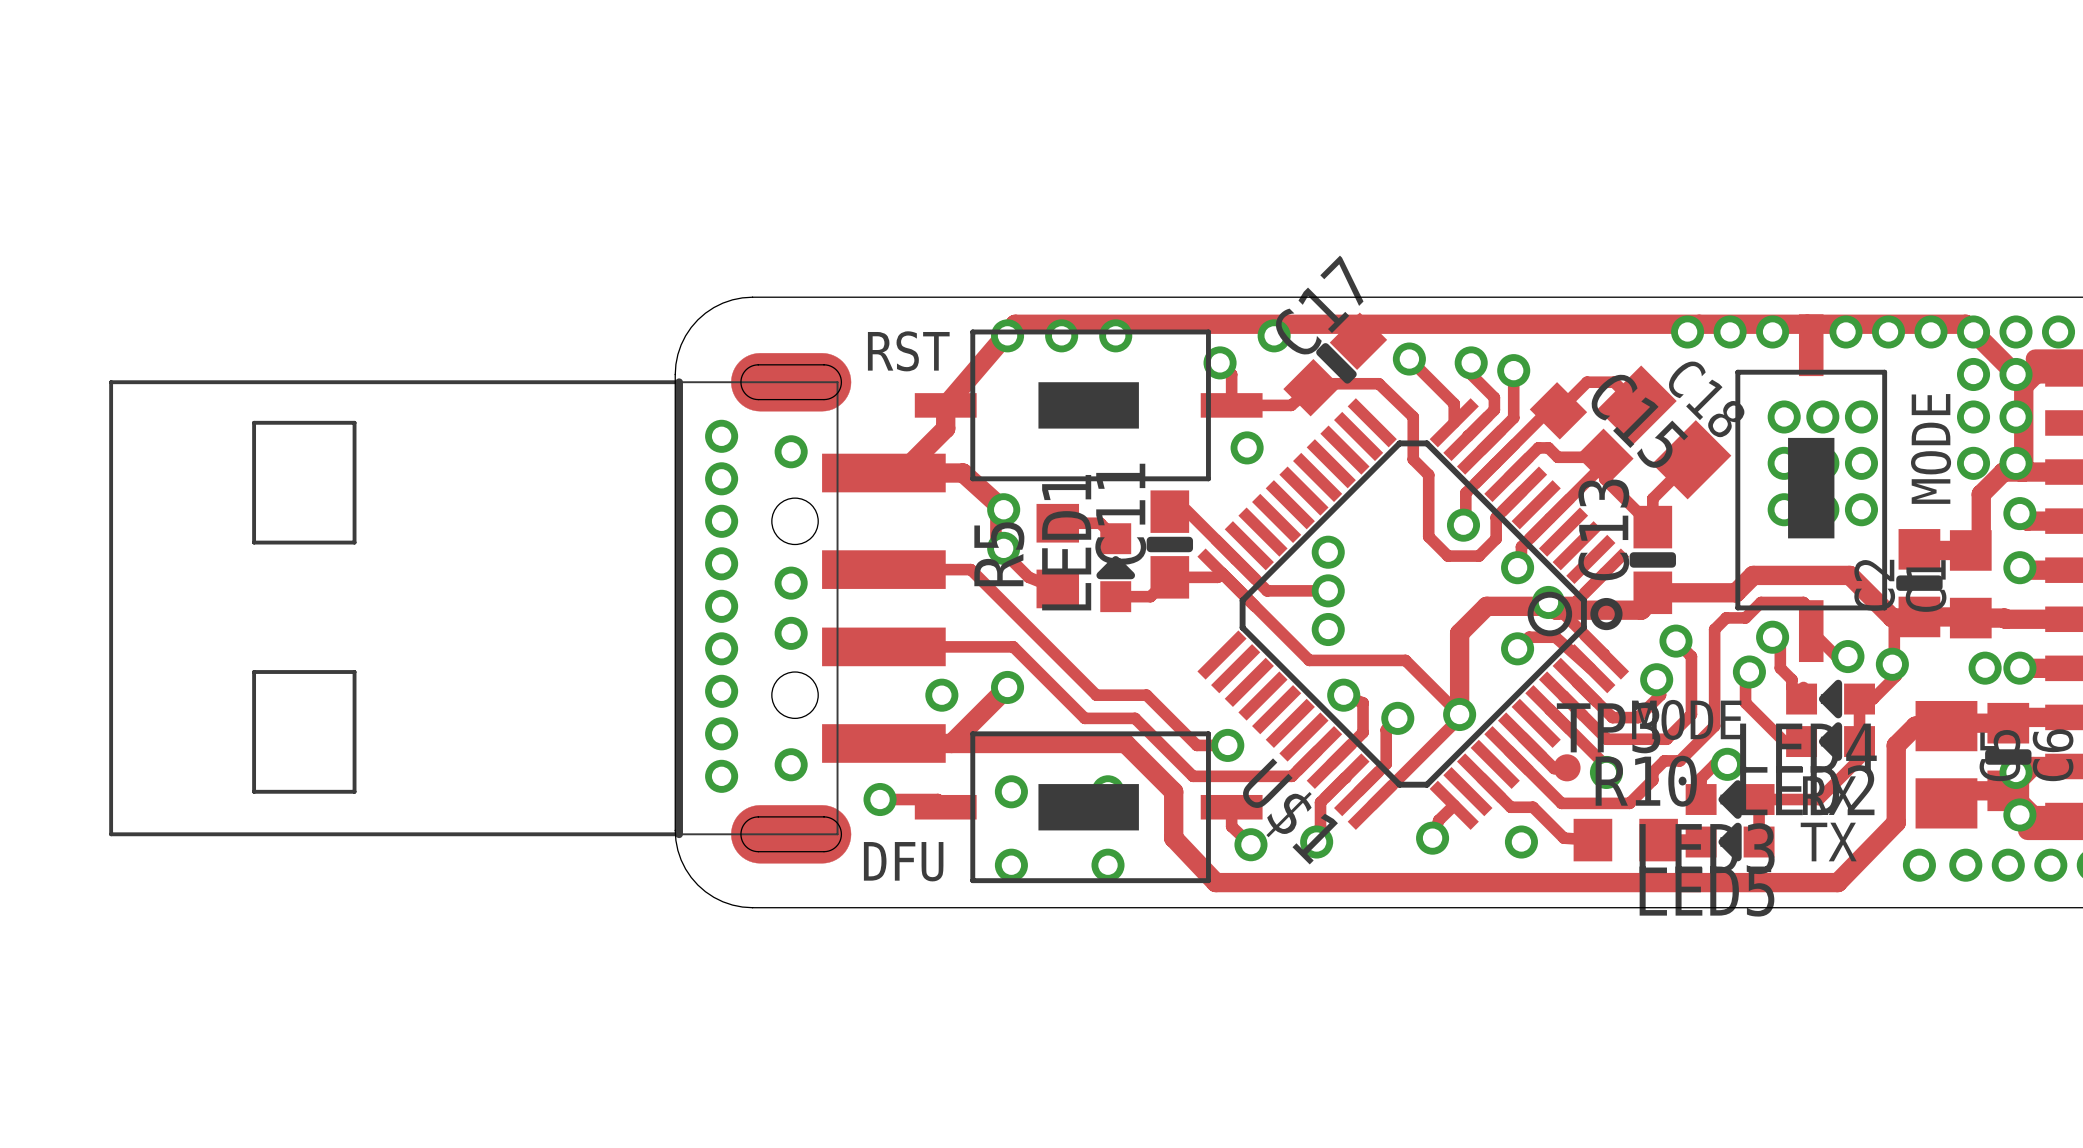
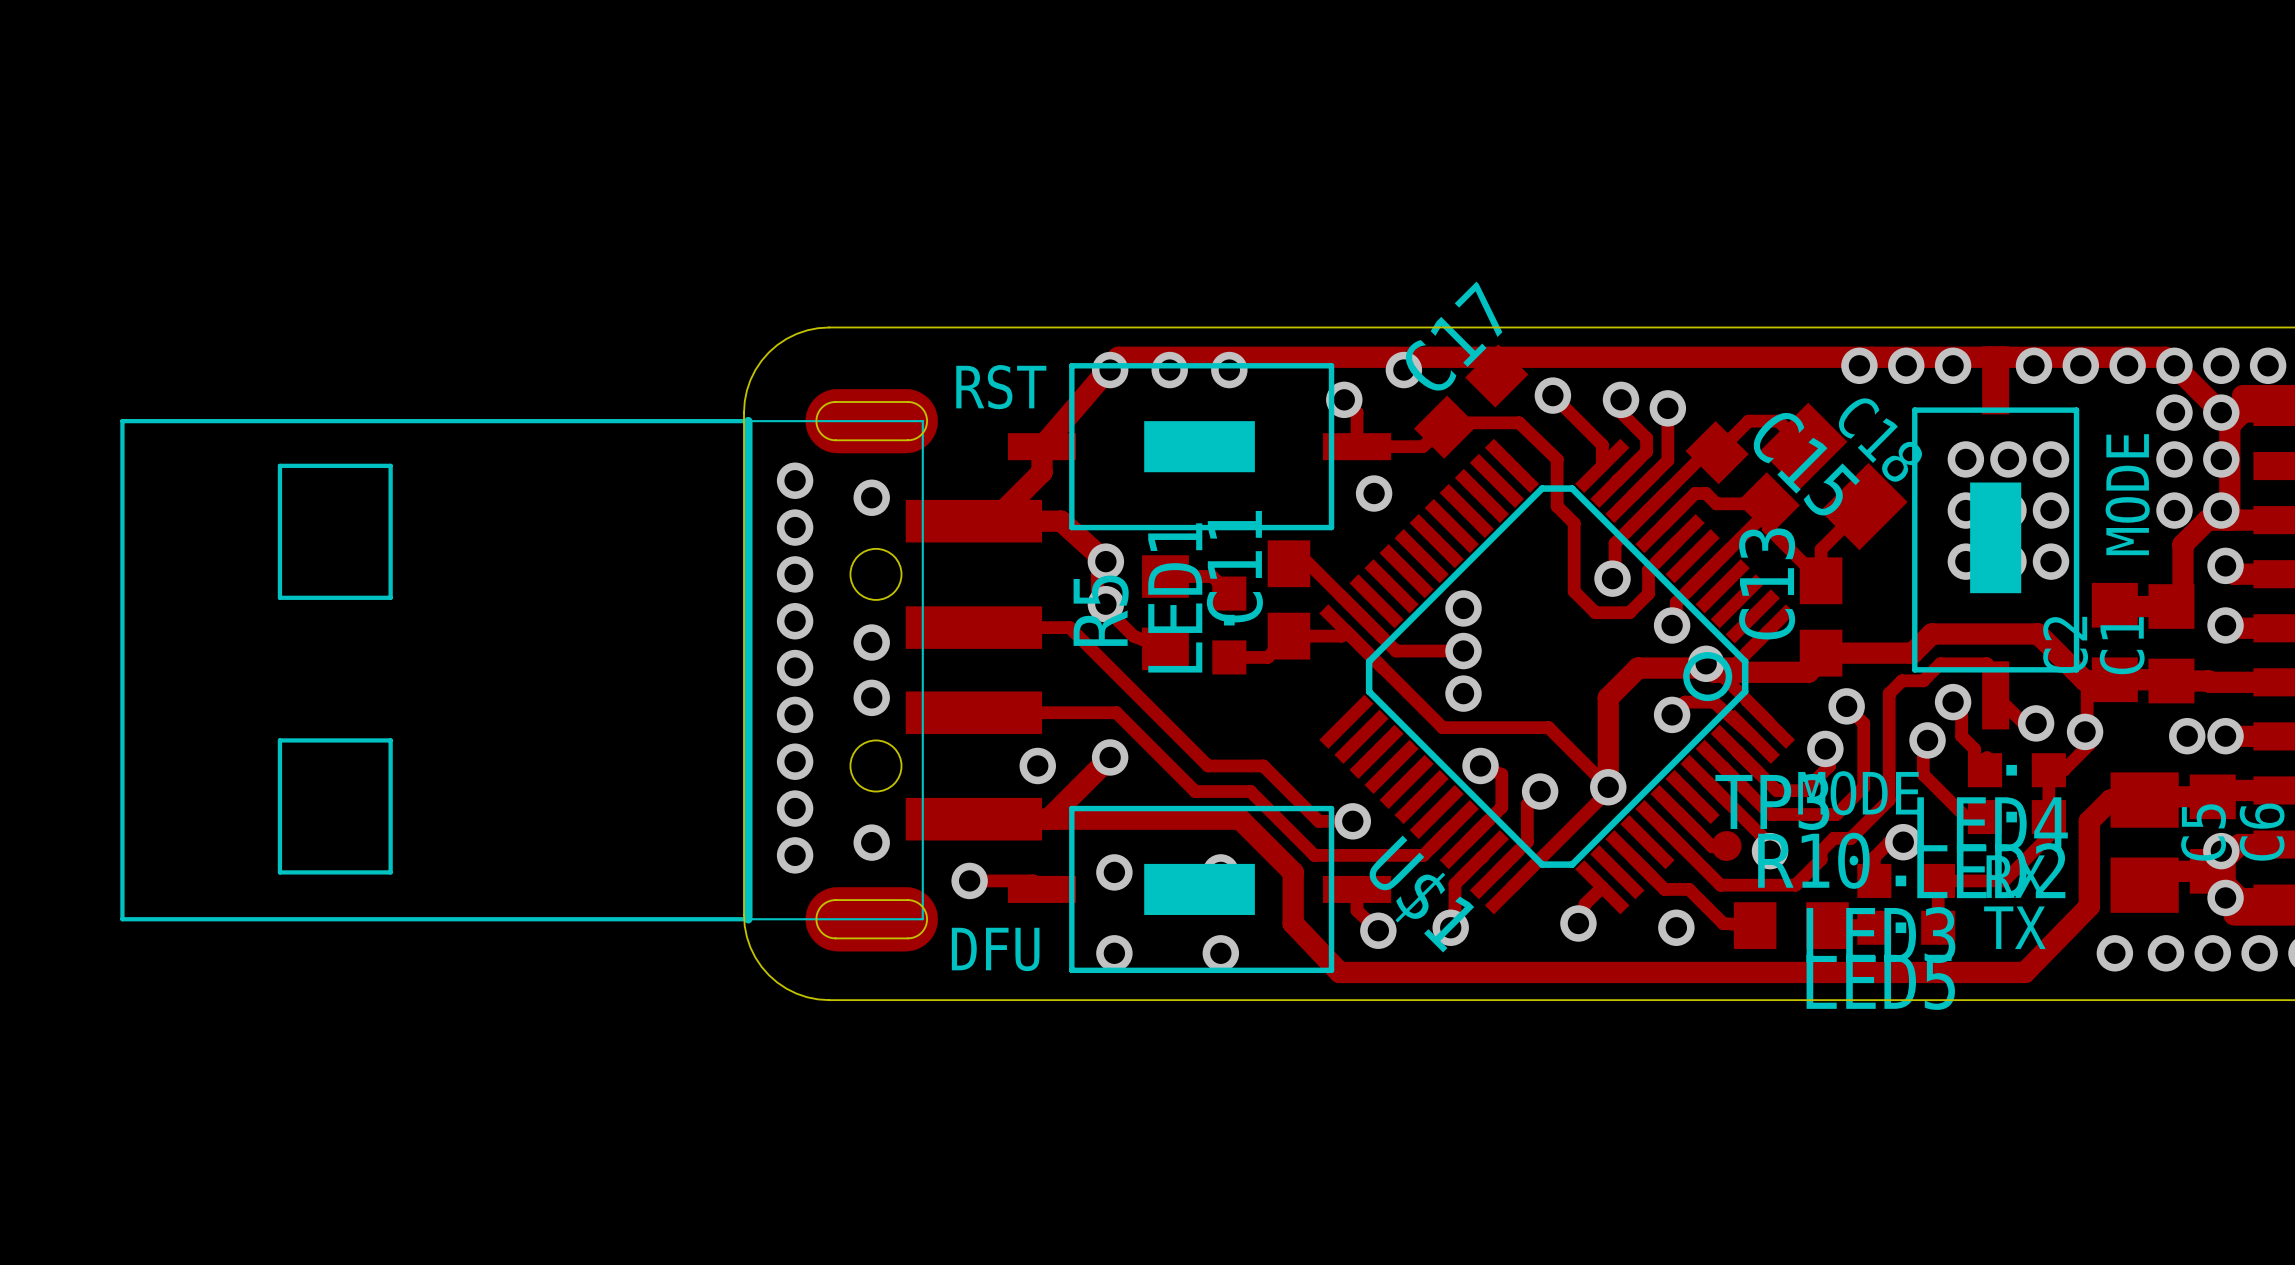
drawing: [1316, 343, 1357, 384] -> none
drawing: [1096, 536, 1194, 580] -> none
drawing: [1590, 552, 1677, 631] -> none
drawing: [1896, 575, 1943, 591] -> none
drawing: [1818, 679, 1843, 761] -> none
drawing: [1985, 749, 2032, 765] -> none
drawing: [1718, 780, 1742, 862] -> none

